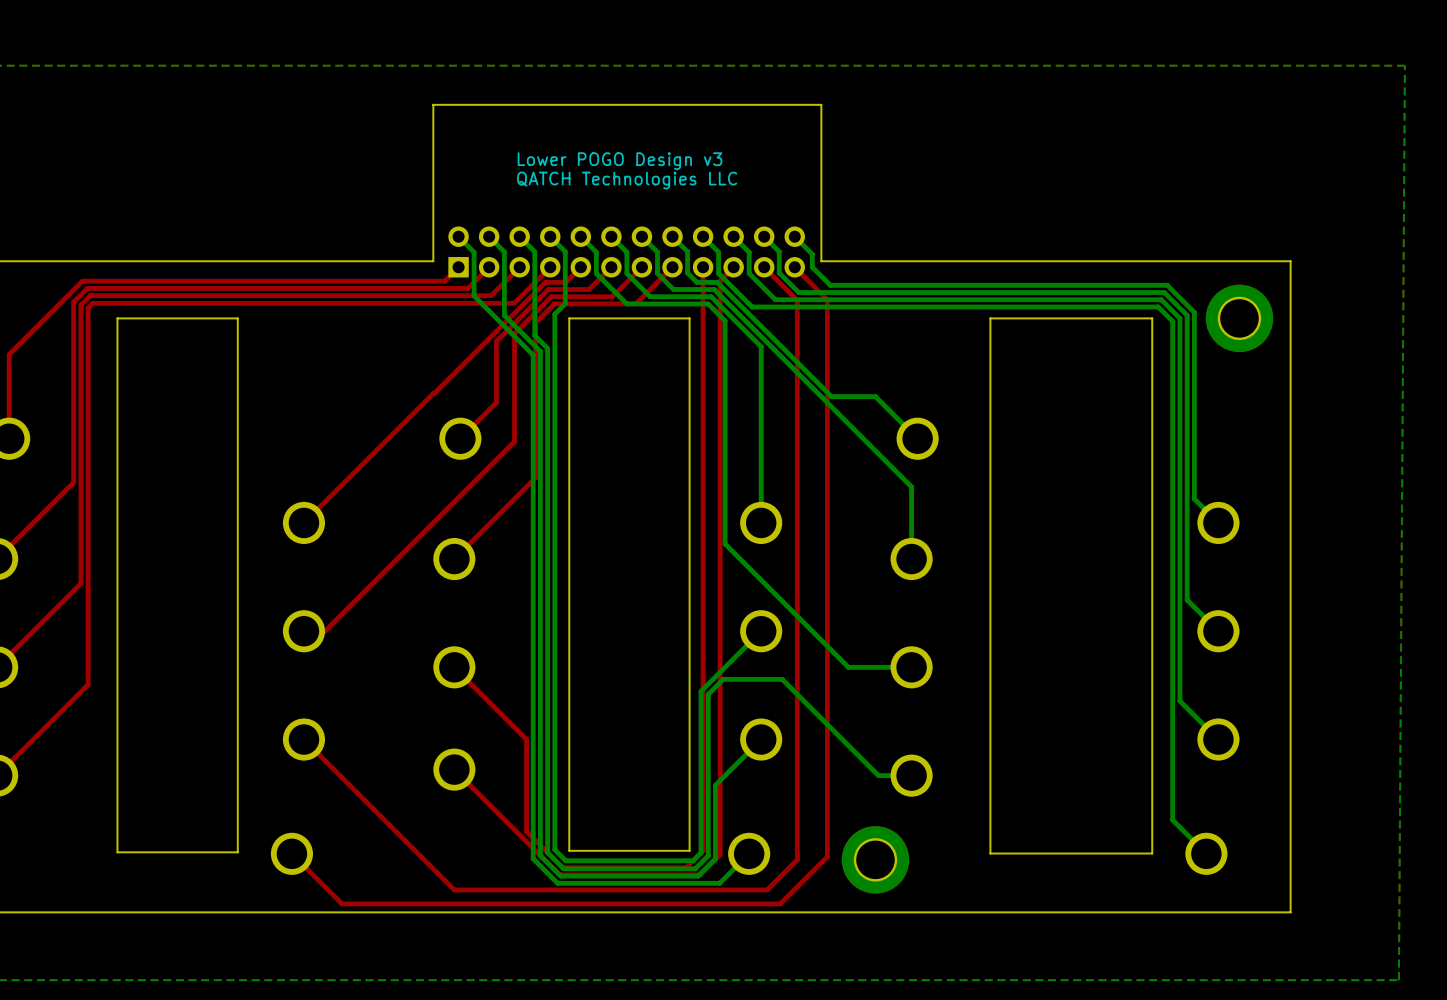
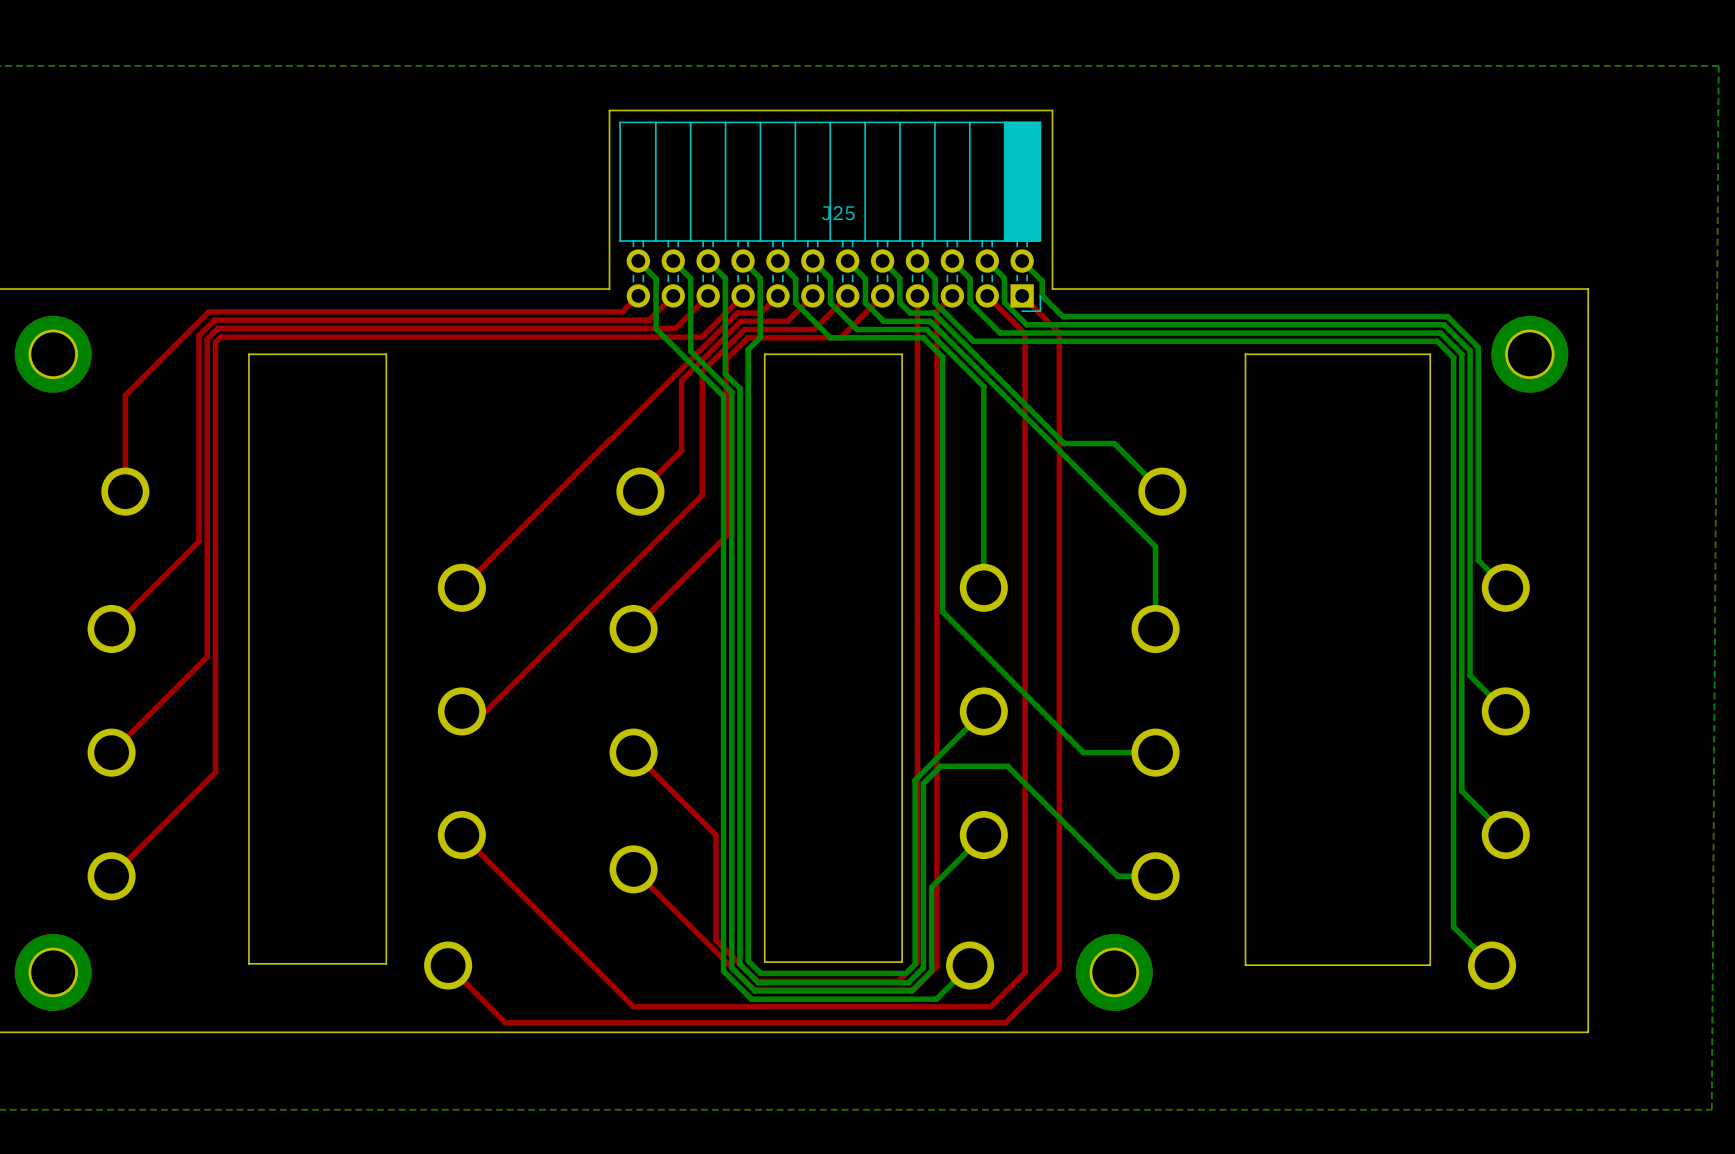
text: Lower POGO Design v3 (620, 161) -> none
text: QATCH Technologies LLC (627, 180) -> none
J25 side: top (626, 251) -> bottom (830, 216)

